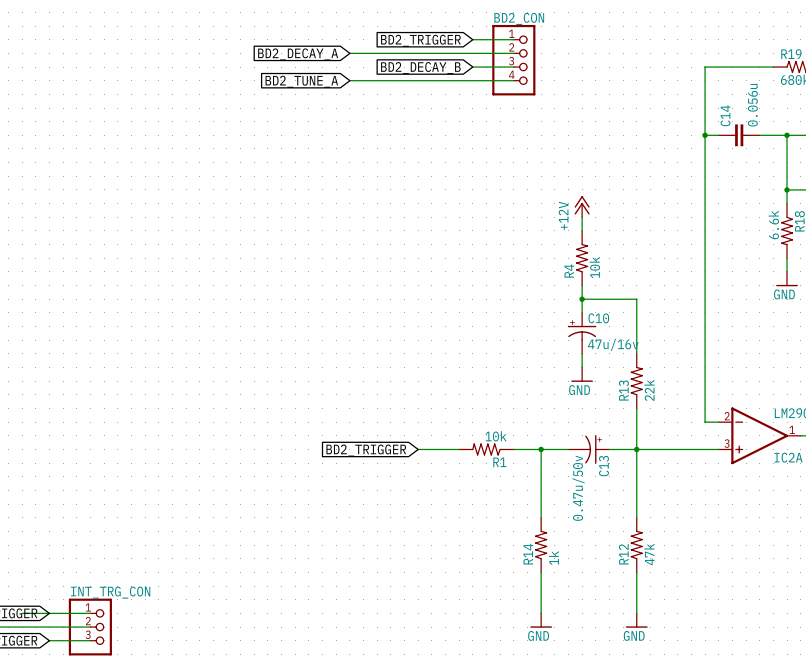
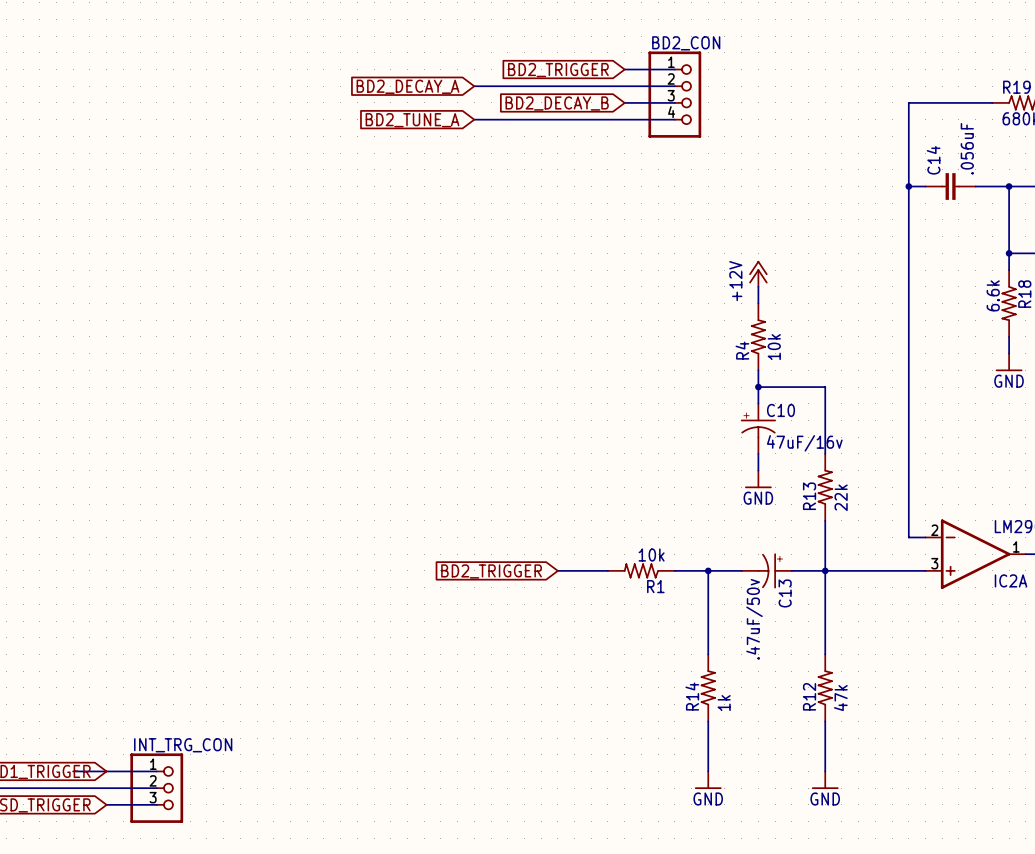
C14 value: 0.056u (752, 105) -> .056uF (967, 148)
C10 value: 47u/16v (613, 344) -> 47uF/16v (804, 443)
C13 value: 0.47u/50v (578, 488) -> .47uF/50v (754, 619)

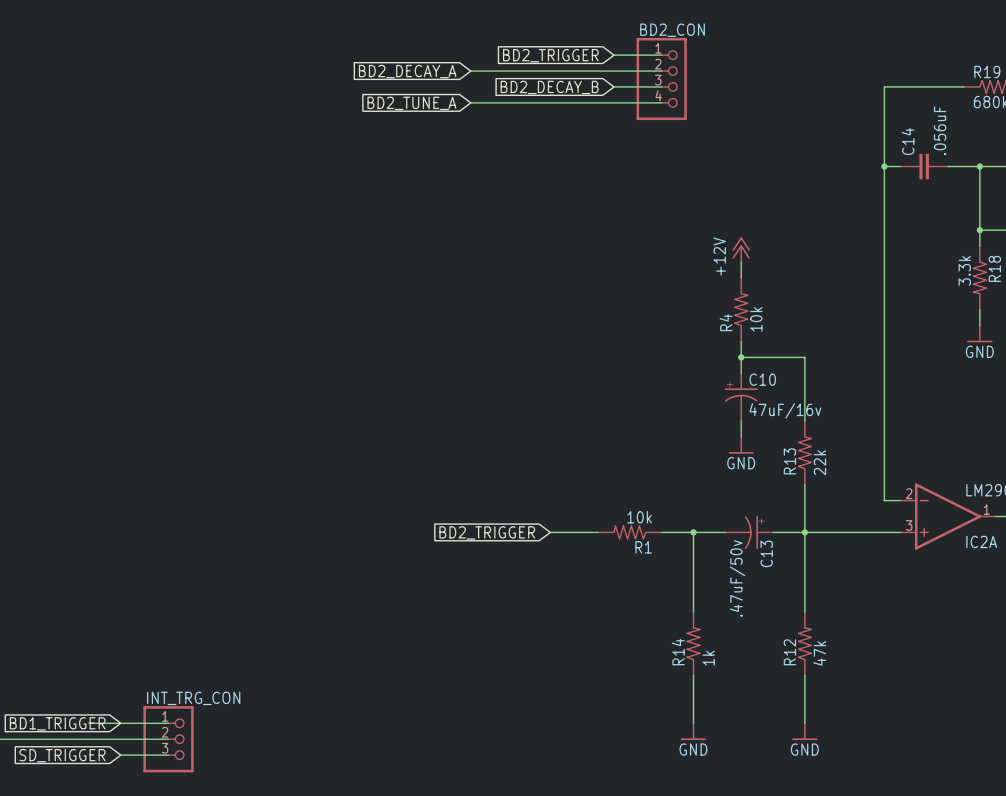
R18 value: 6.6k (993, 295) -> 3.3k (964, 270)

